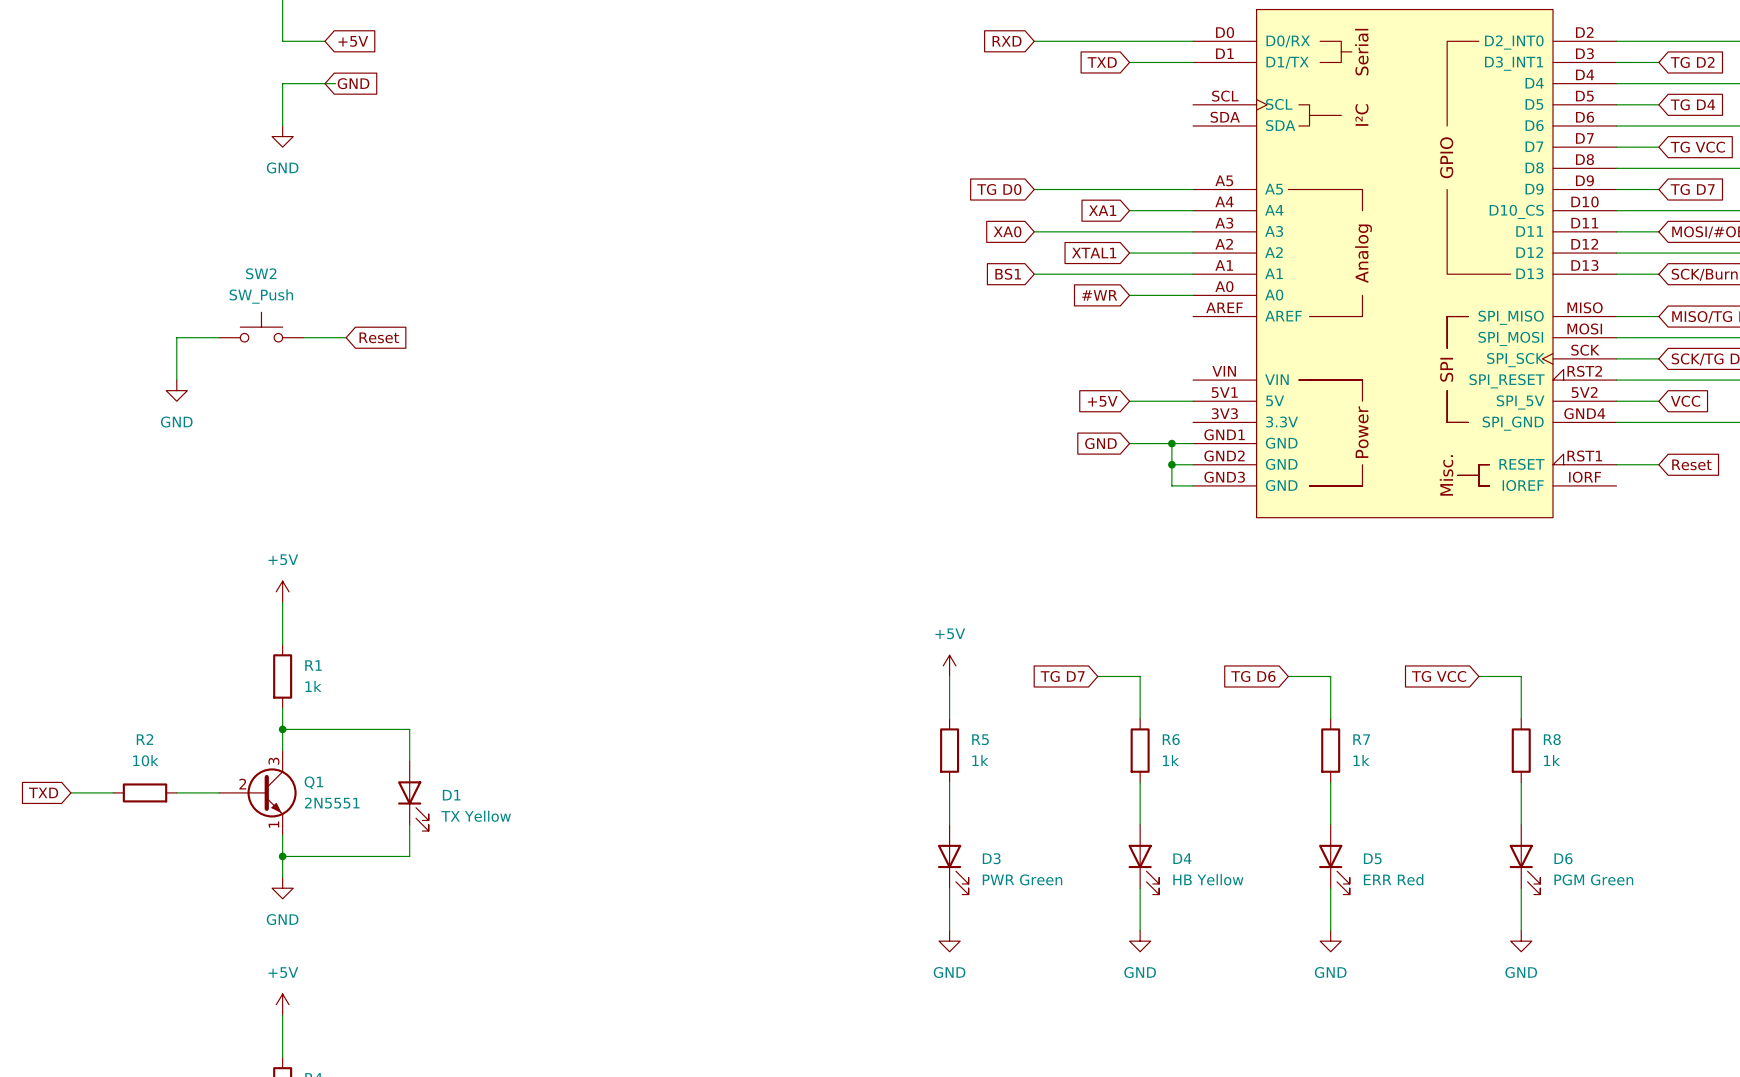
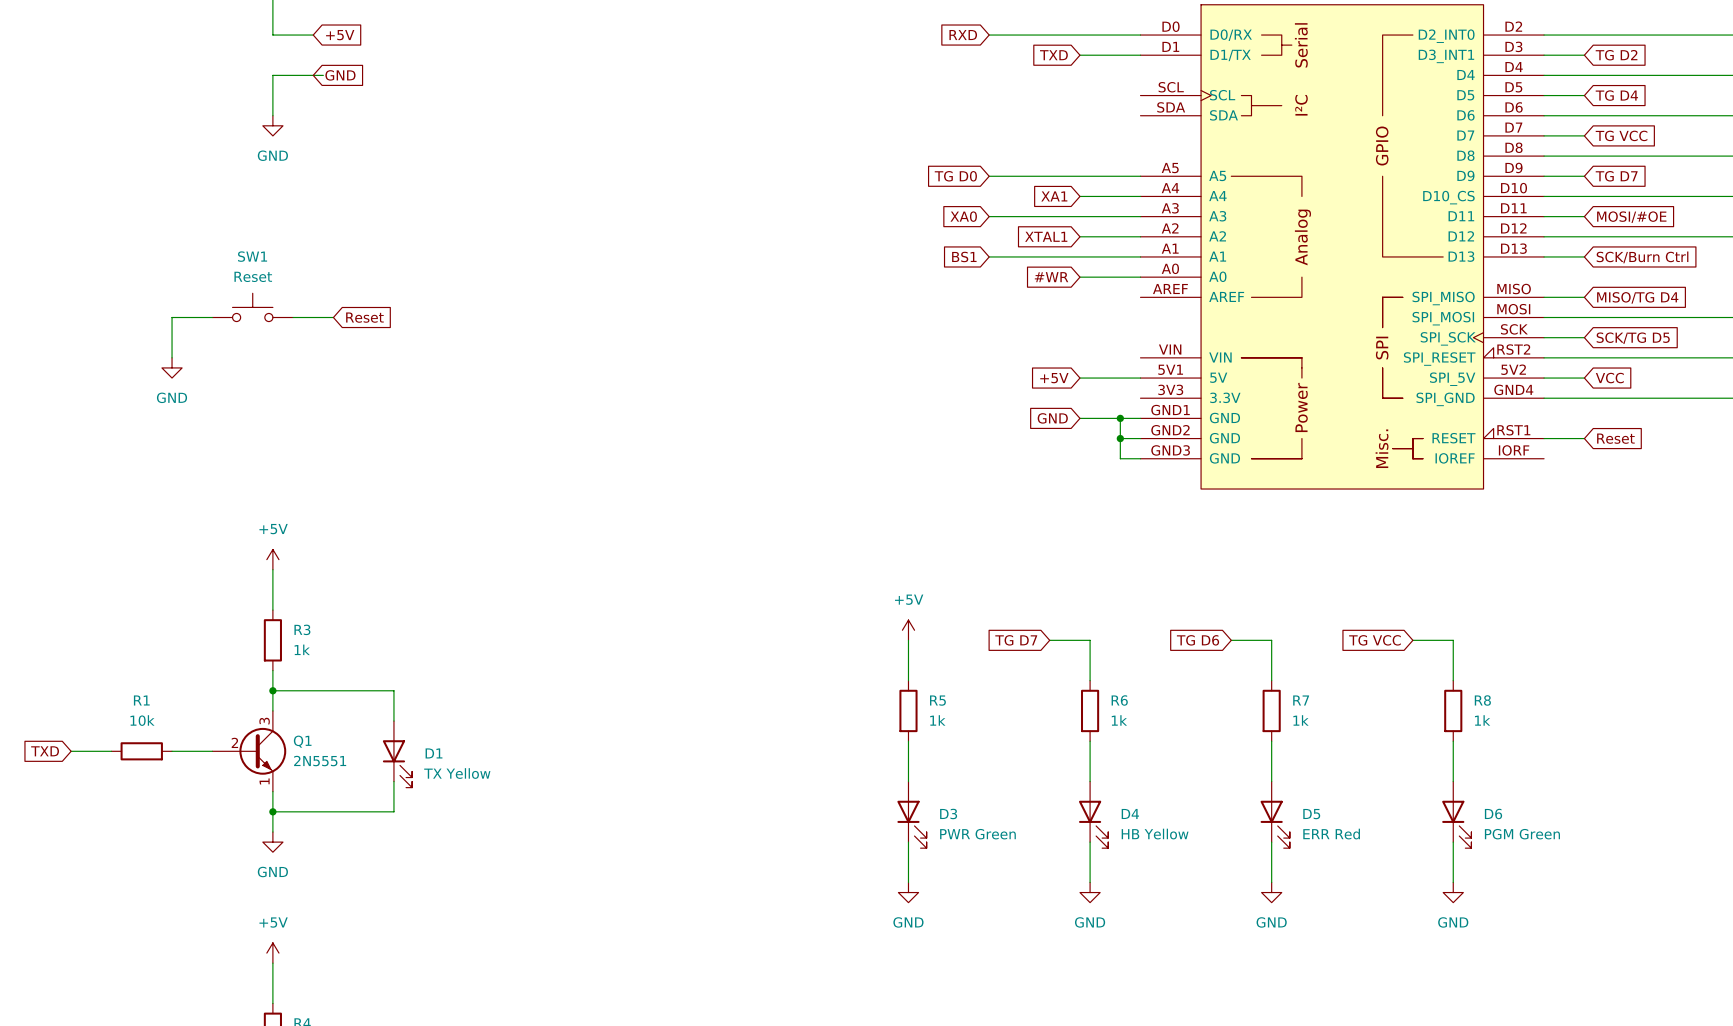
SW2 name: SW2 (261, 273) -> SW1 (252, 256)
SW2 value: SW_Push (261, 296) -> Reset (253, 276)
R1 name: R1 (313, 665) -> R3 (302, 629)
R2 name: R2 (145, 739) -> R1 (141, 700)

